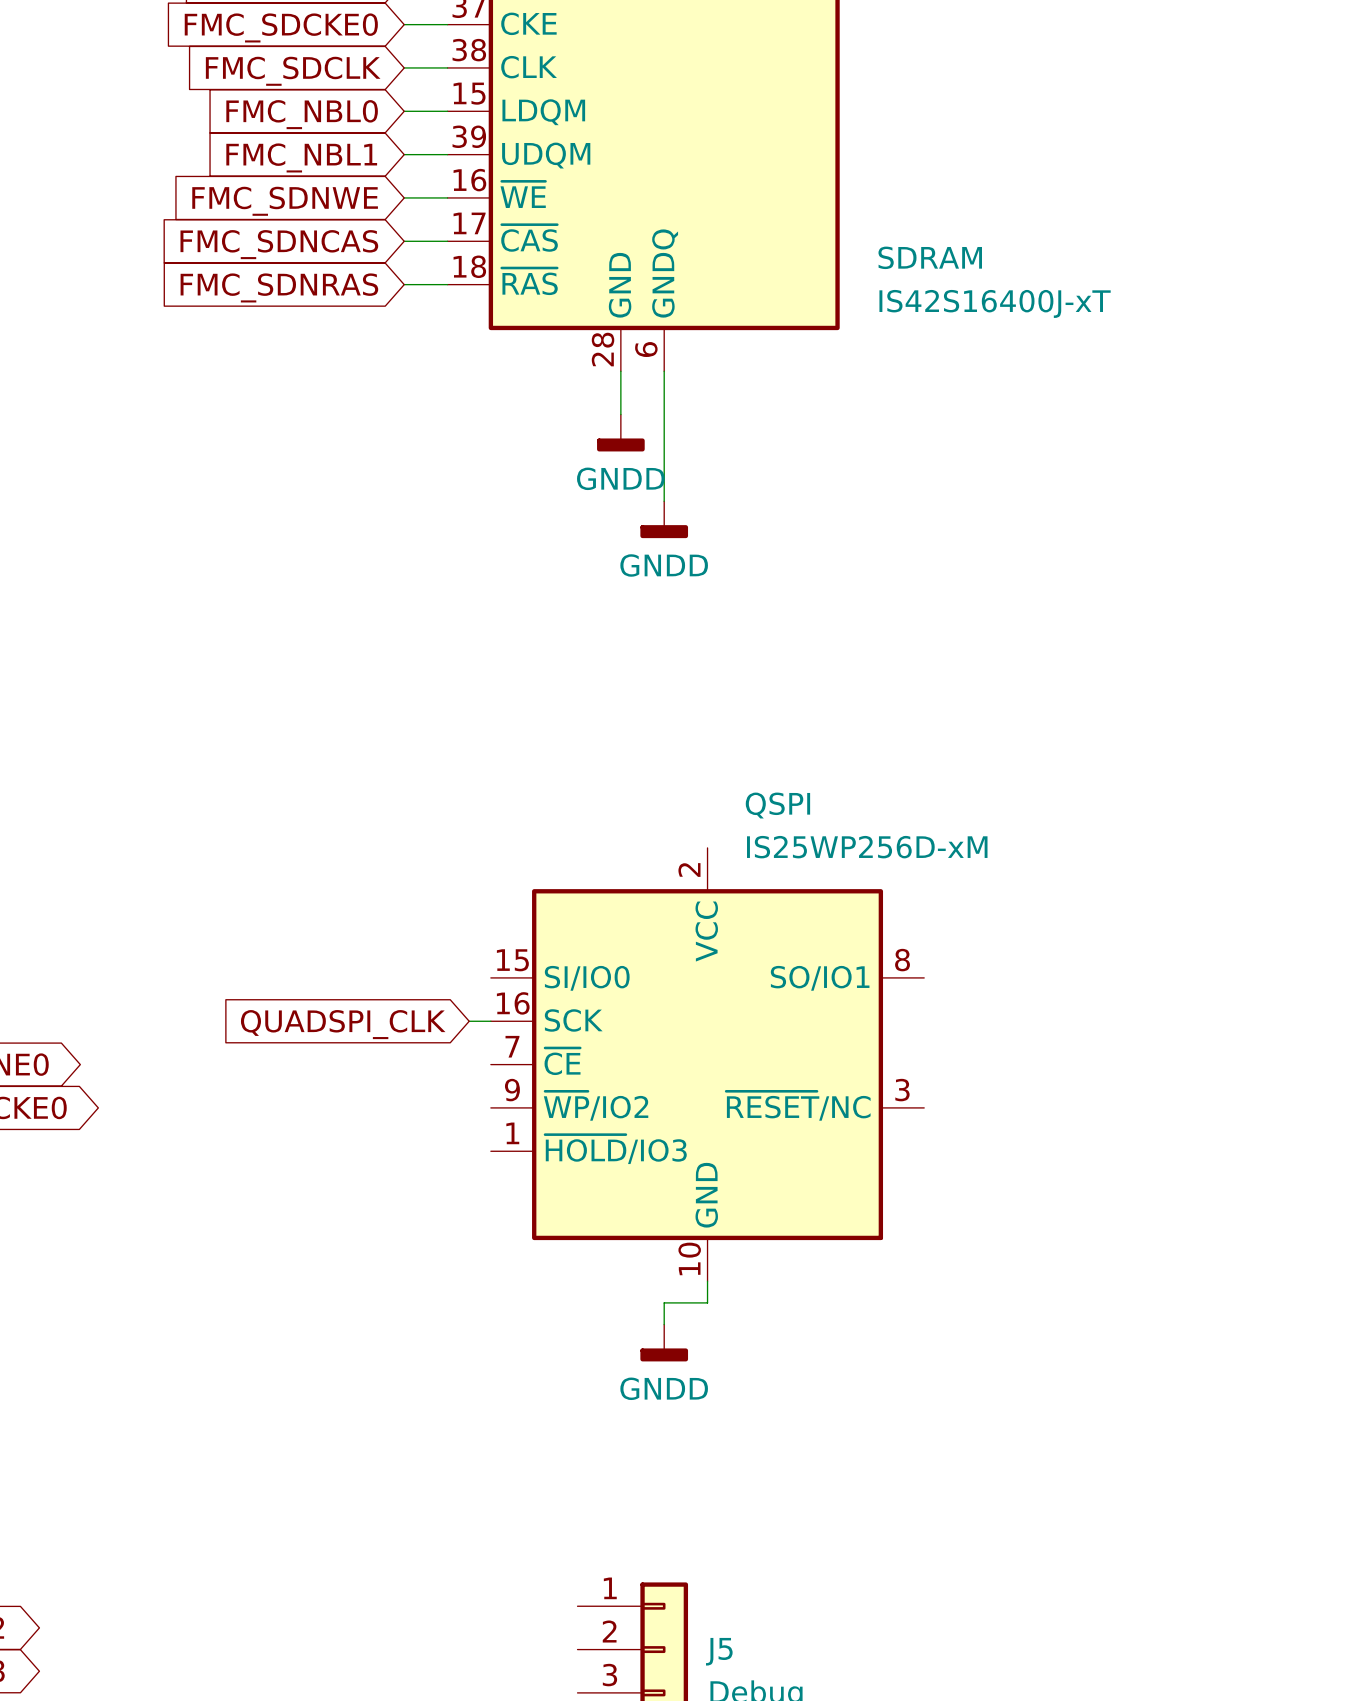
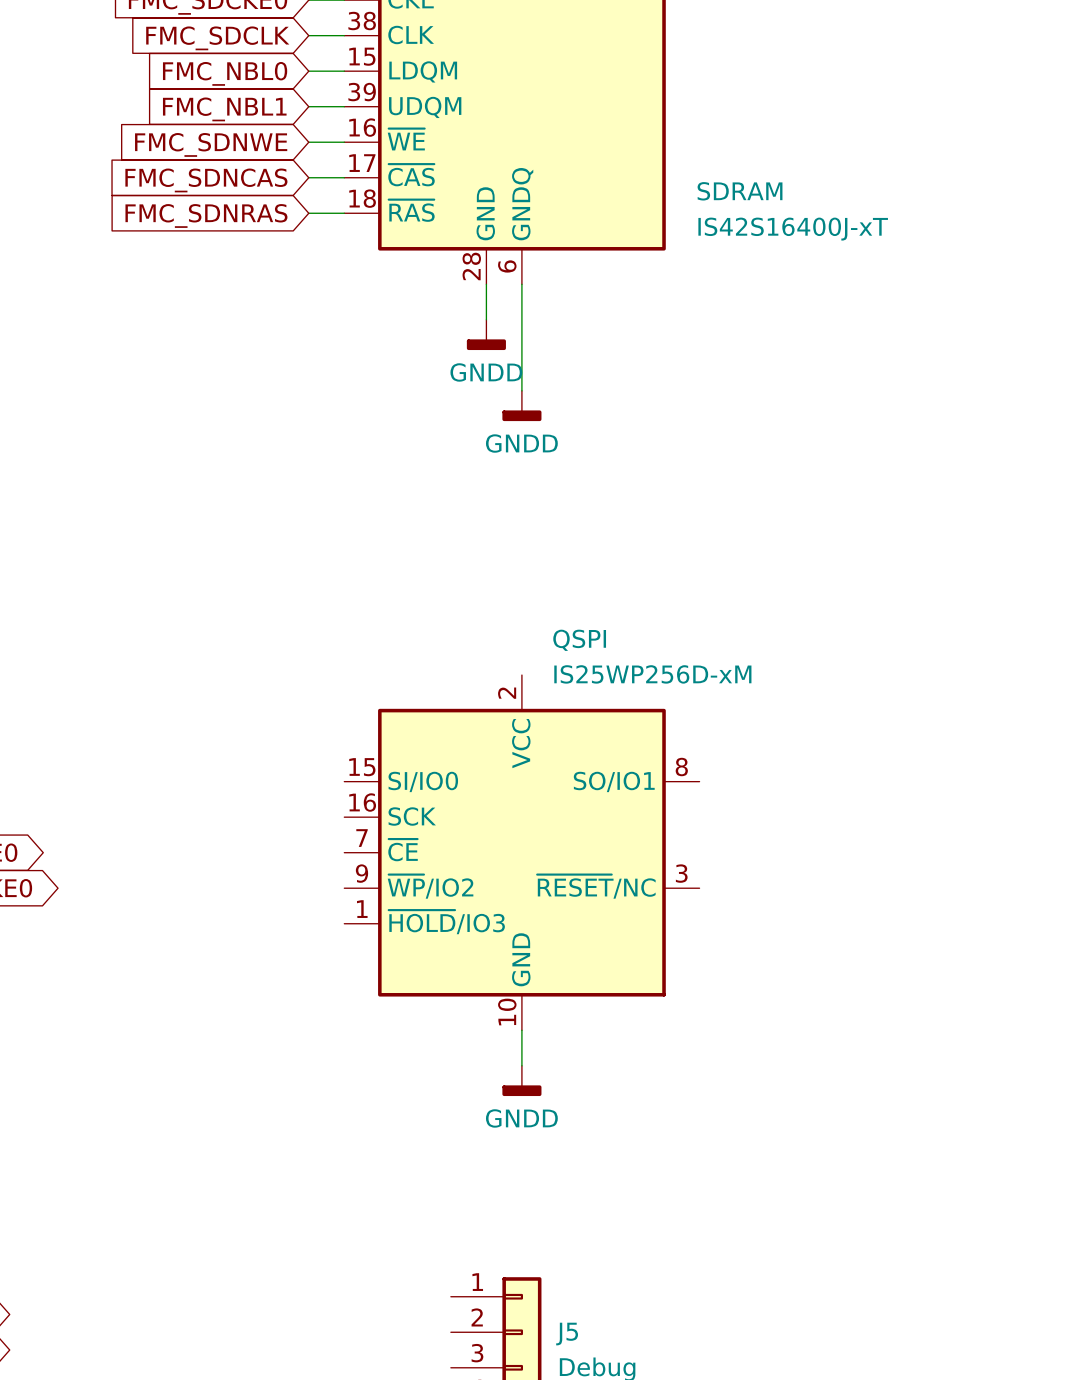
global label: QUADSPI_CLK (343, 1024) -> none
QSPI position: (707, 1064) -> (521, 852)
wire: (707, 1281) (707, 1302) (664, 1302) -> (521, 1030) (521, 1048)

